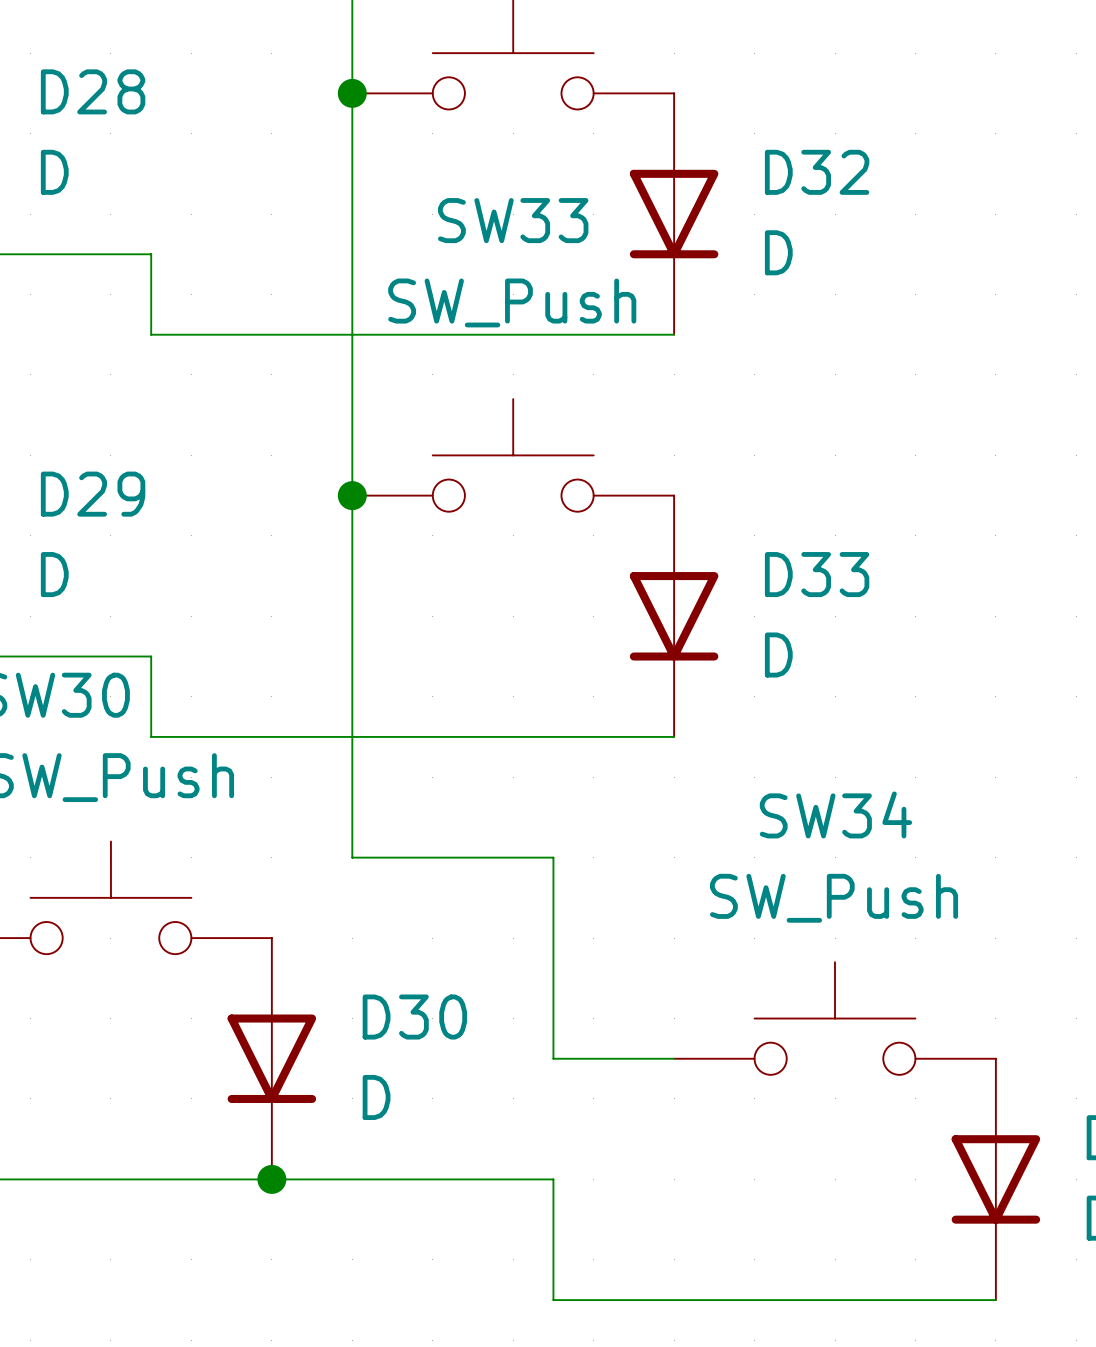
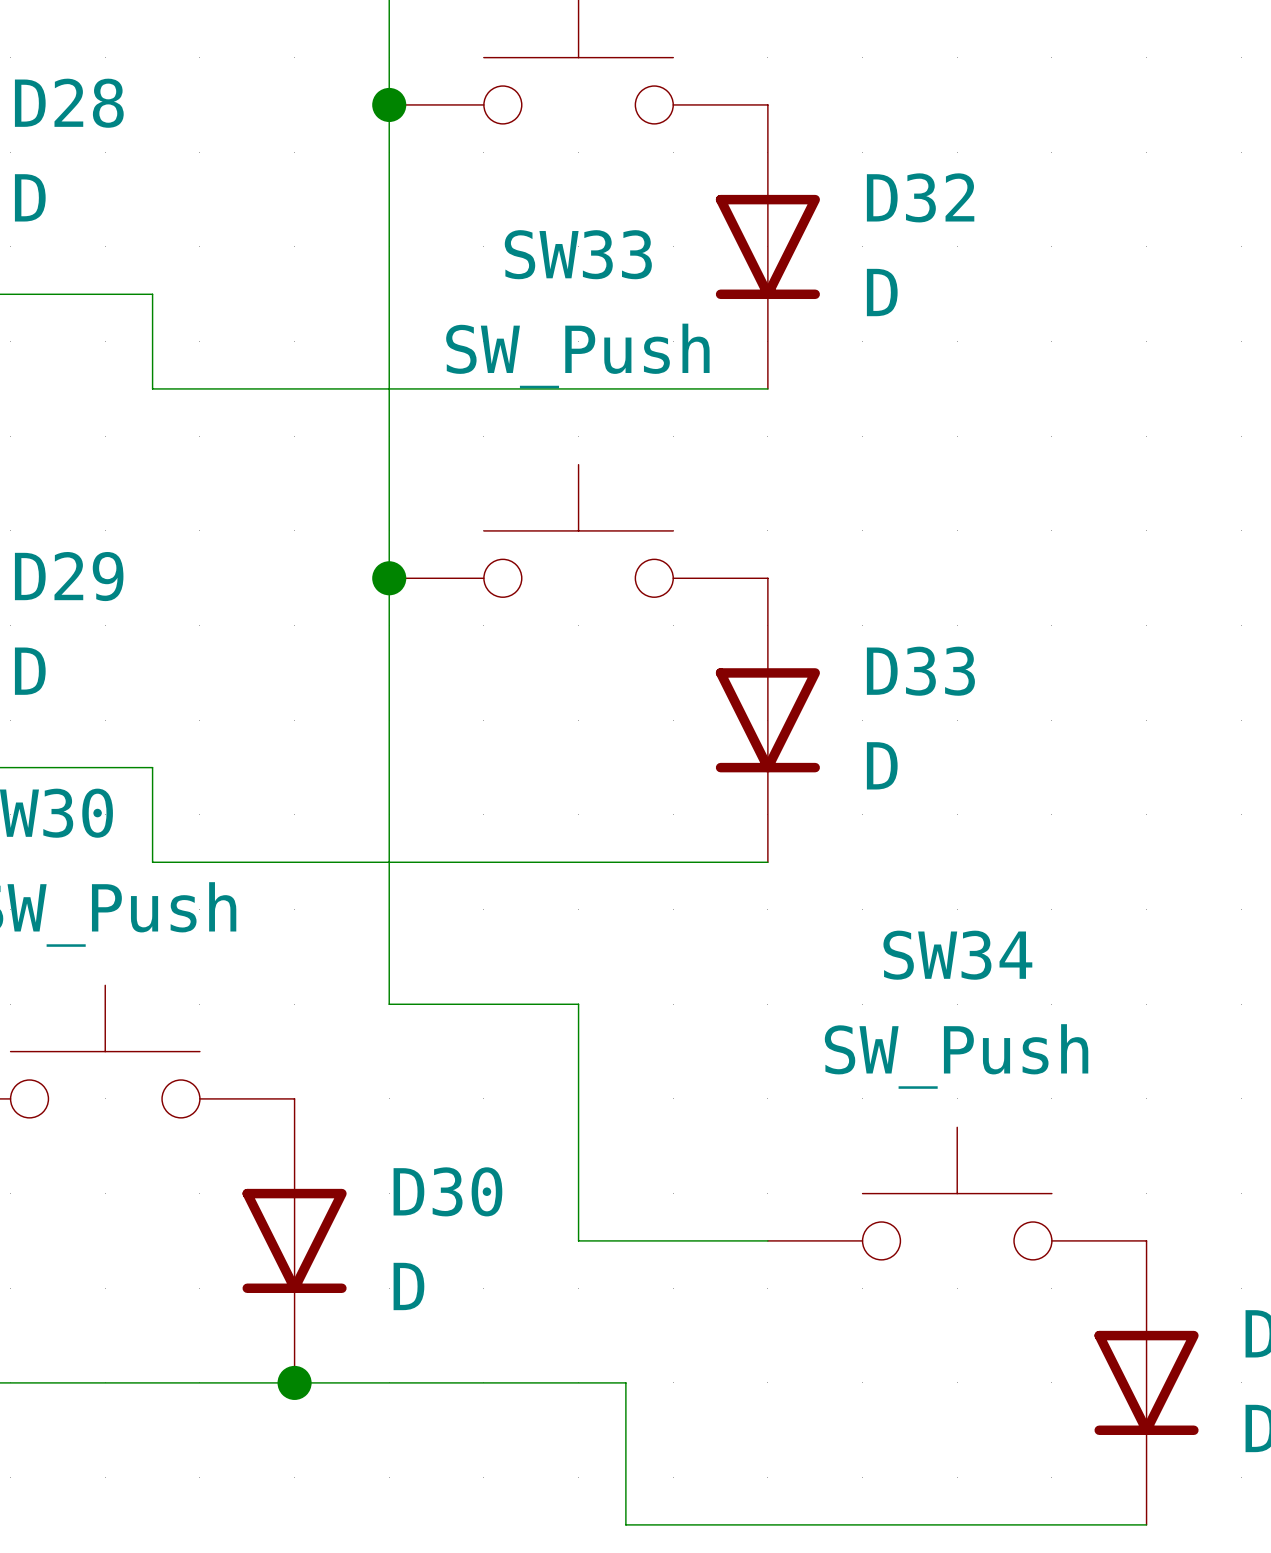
wire: (513, 857) (553, 857) (553, 1058) -> (578, 1004) (578, 1240) (625, 1240)

